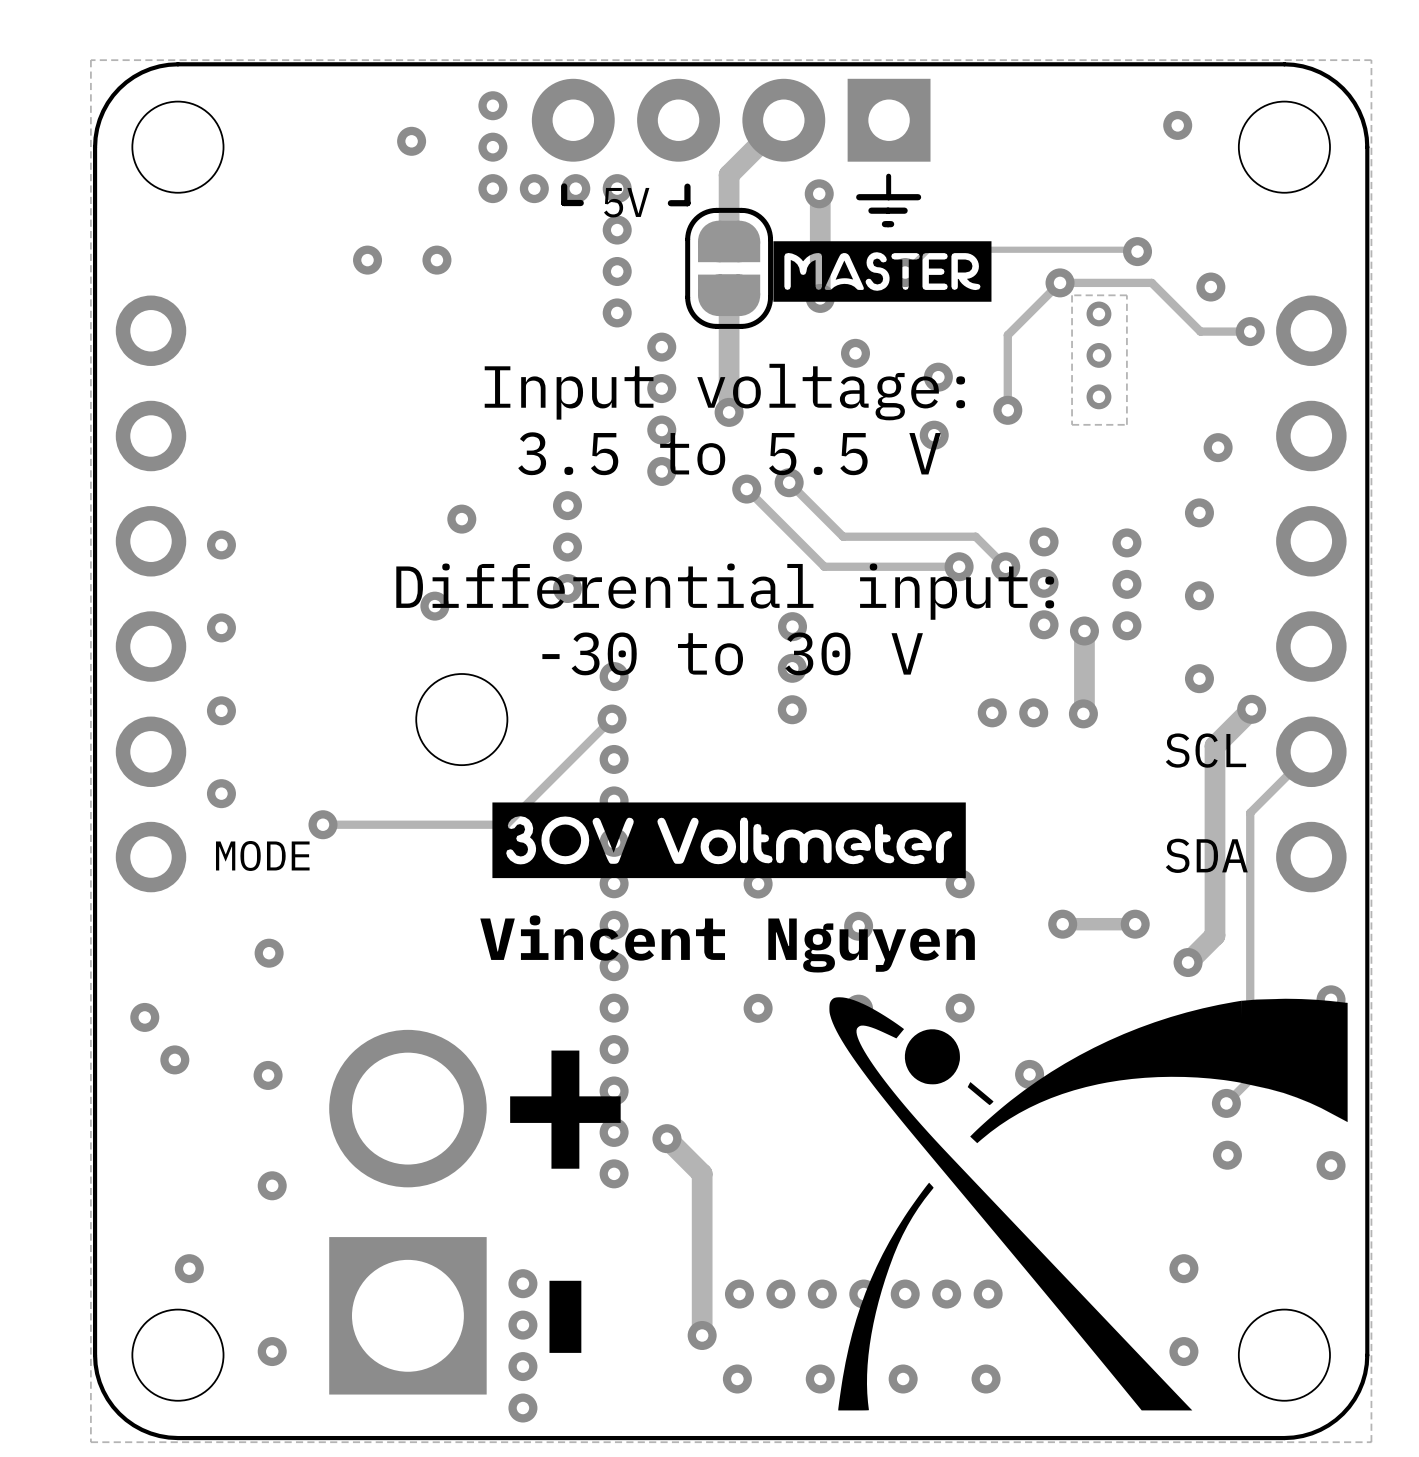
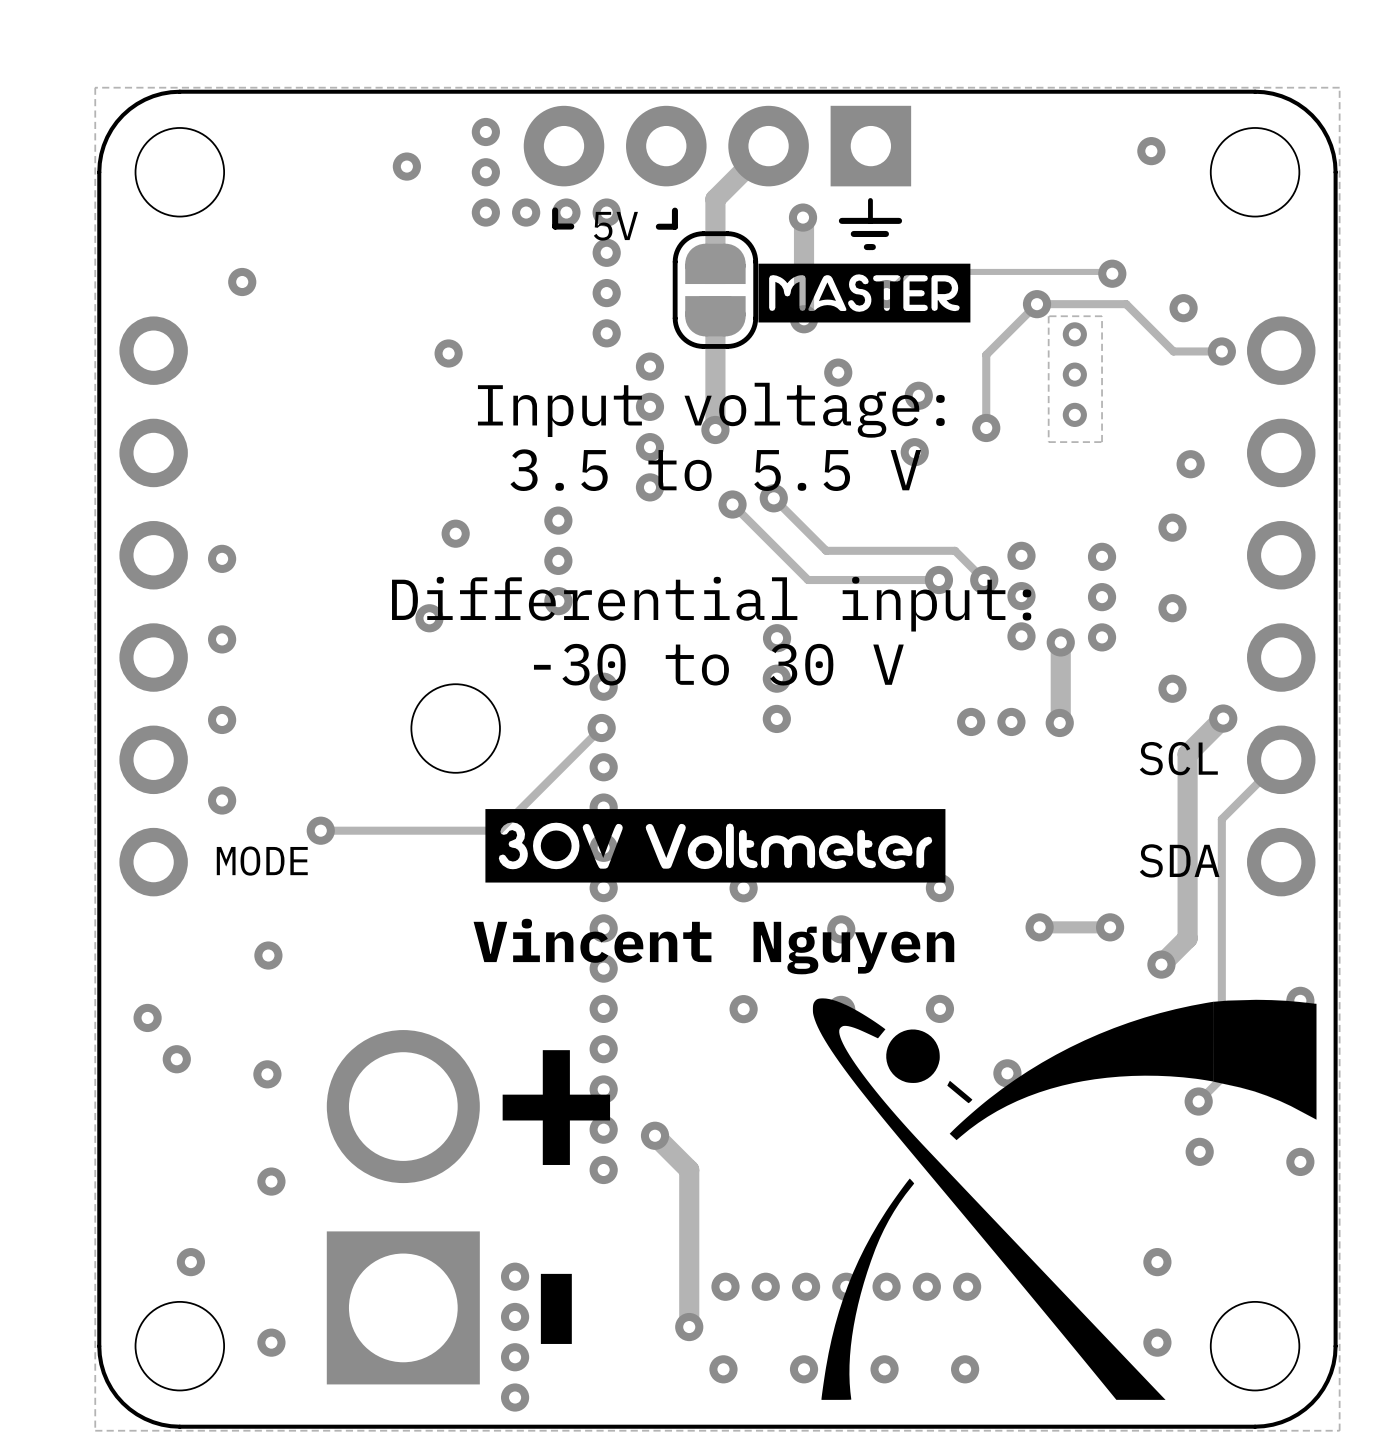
via: none -> (242, 282)
via: (367, 260) -> none
via: (436, 260) -> none
via: none -> (448, 353)

